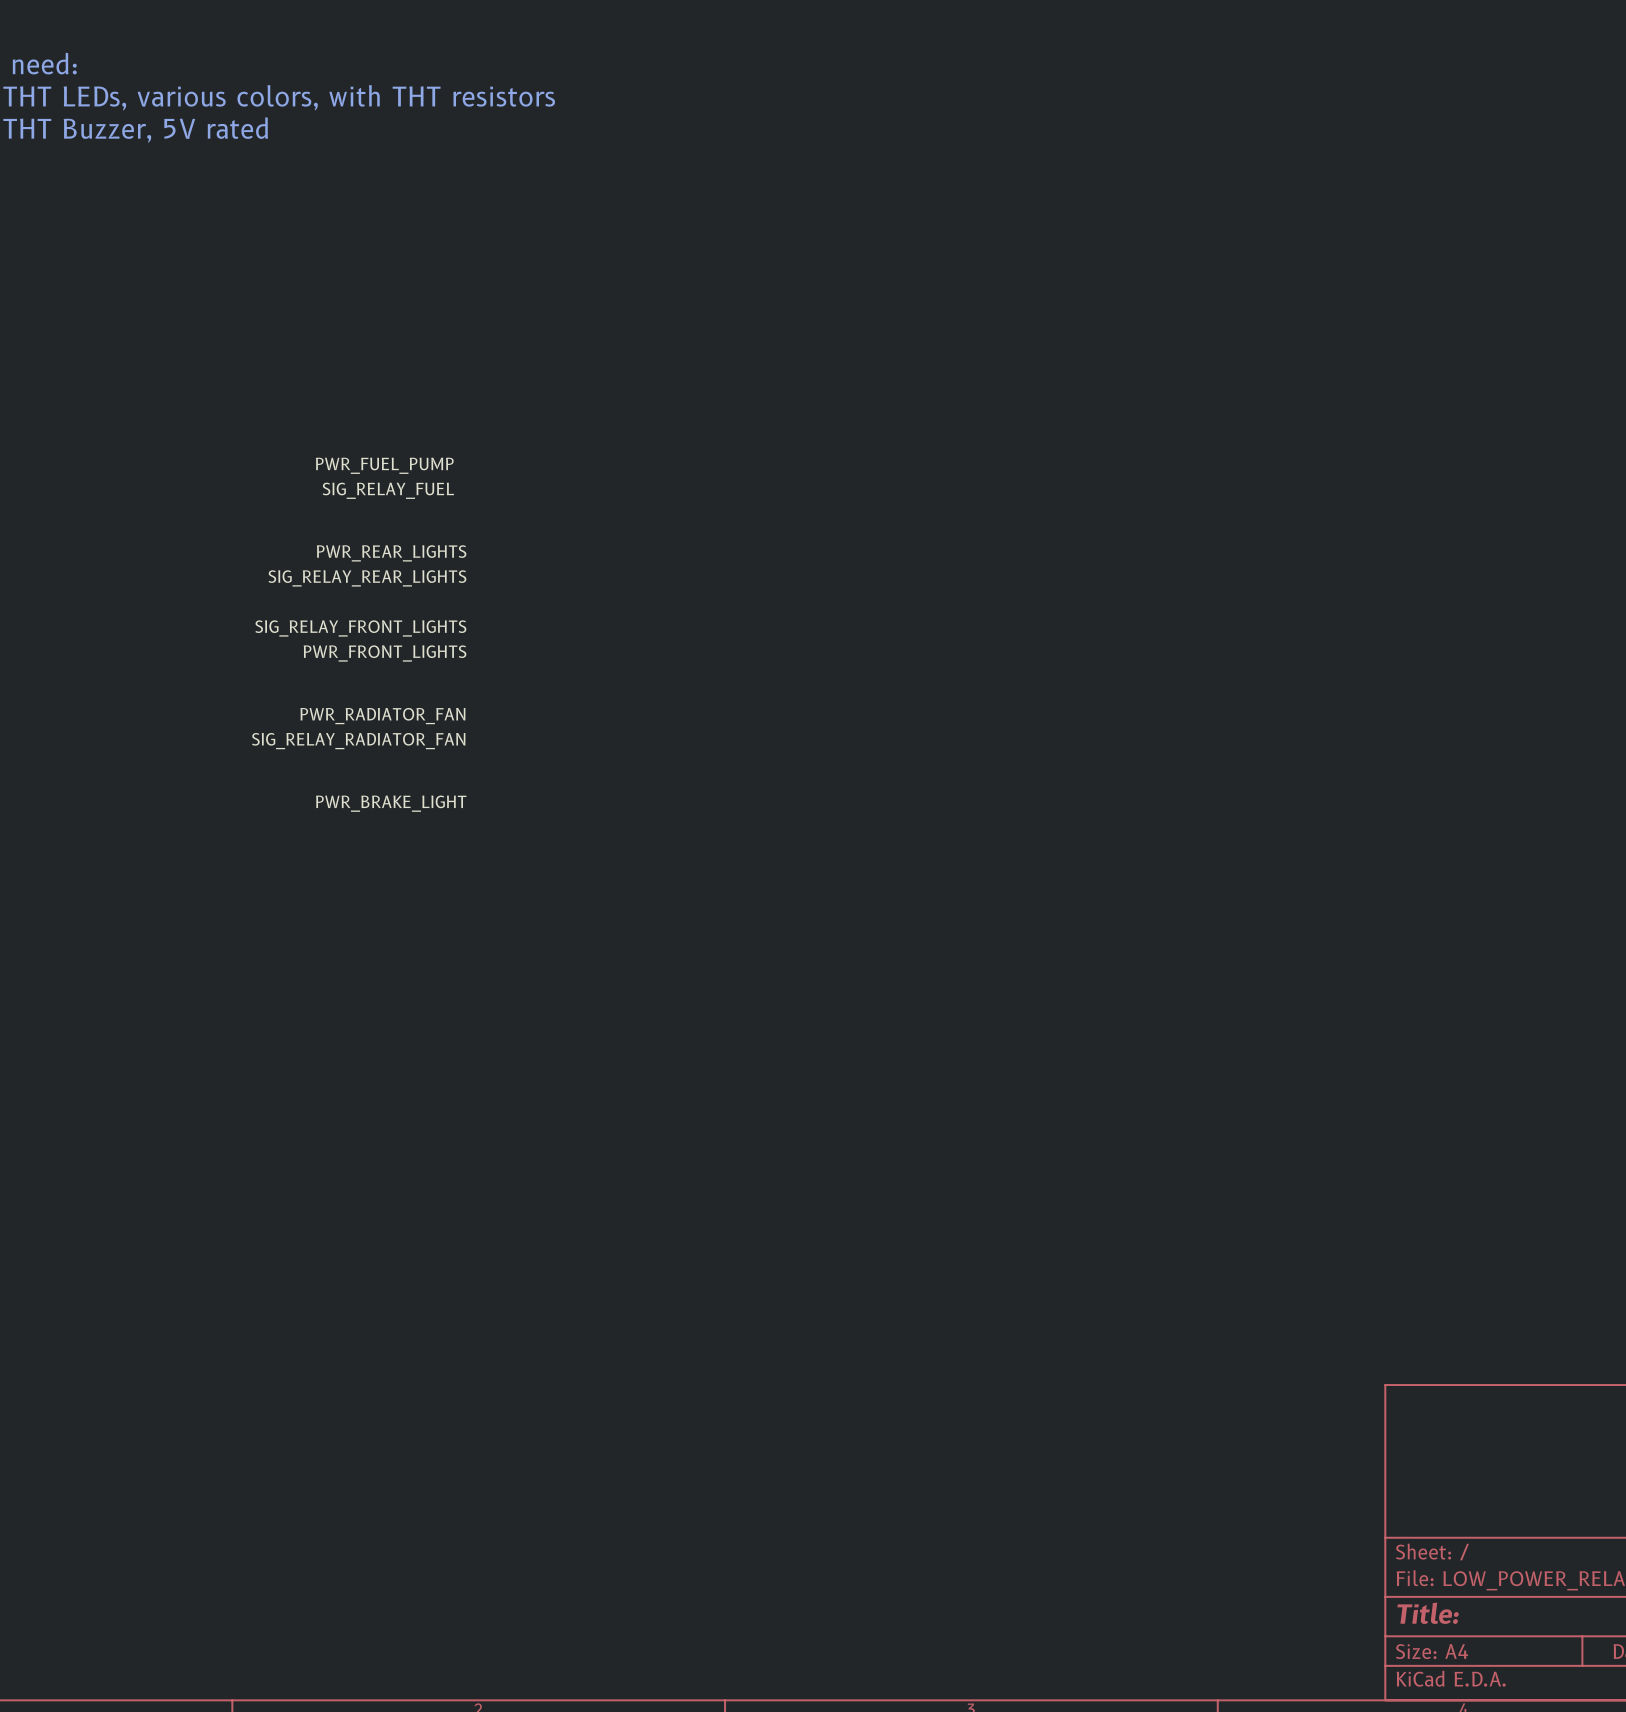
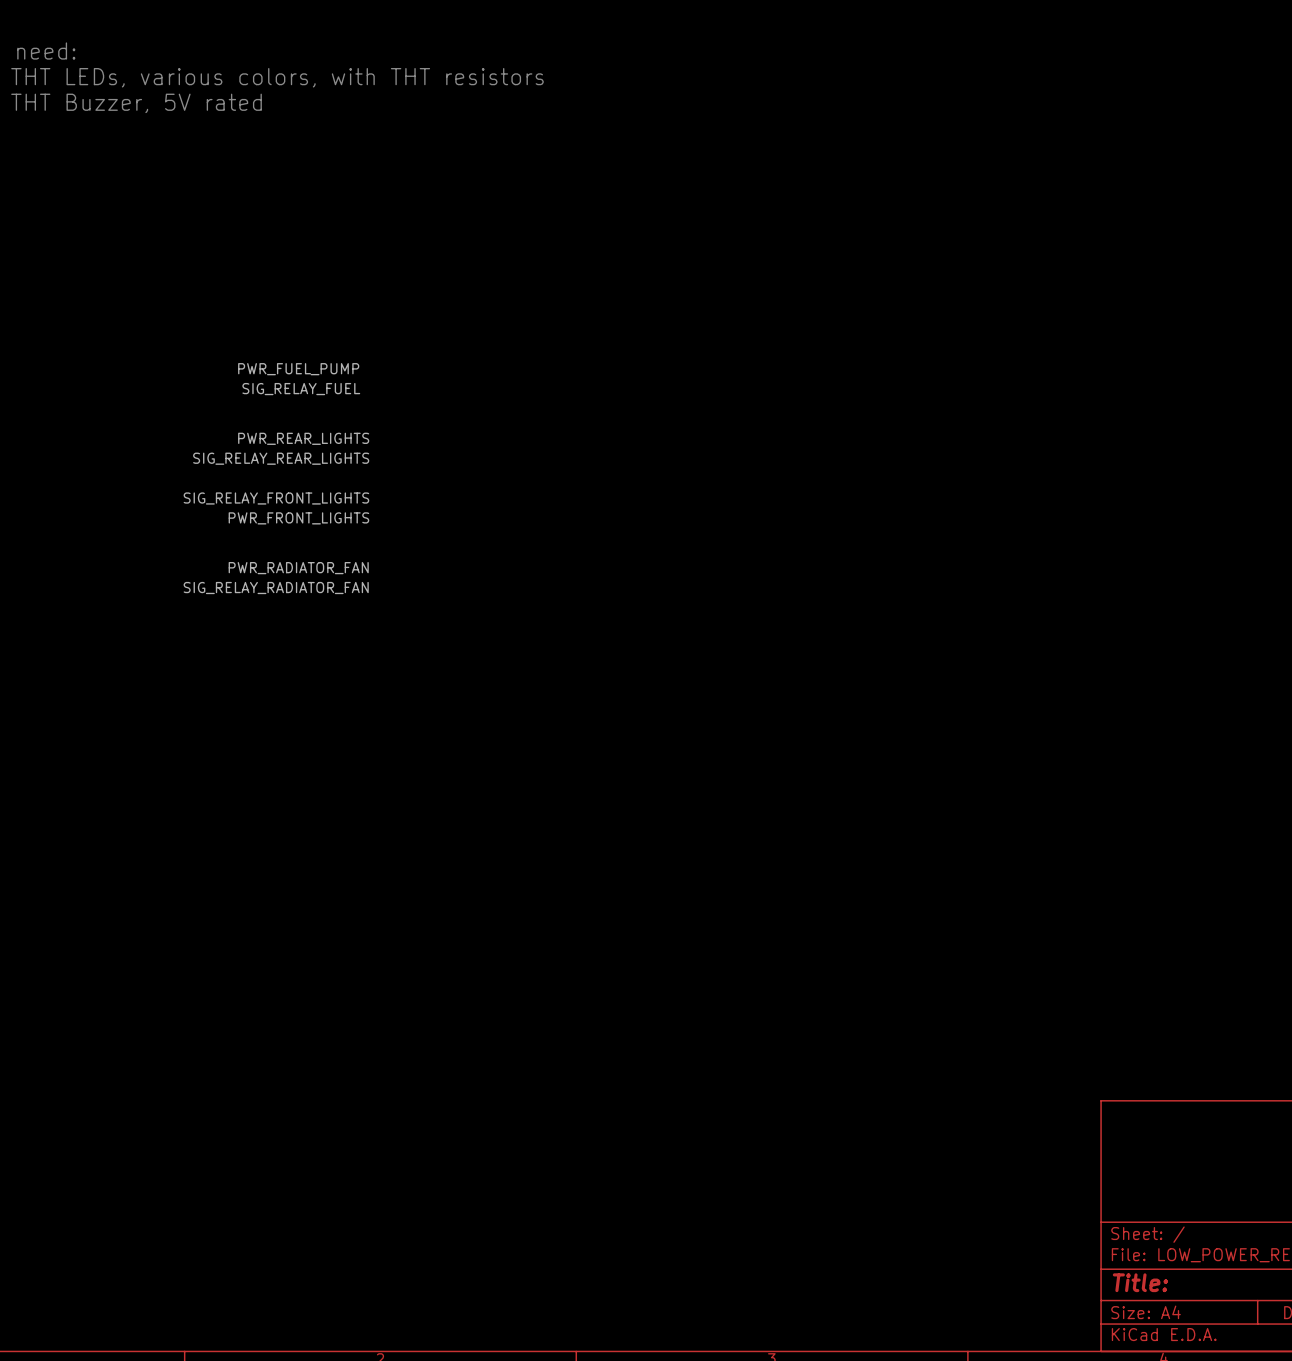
label: PWR_BRAKE_LIGHT (391, 803) -> none

